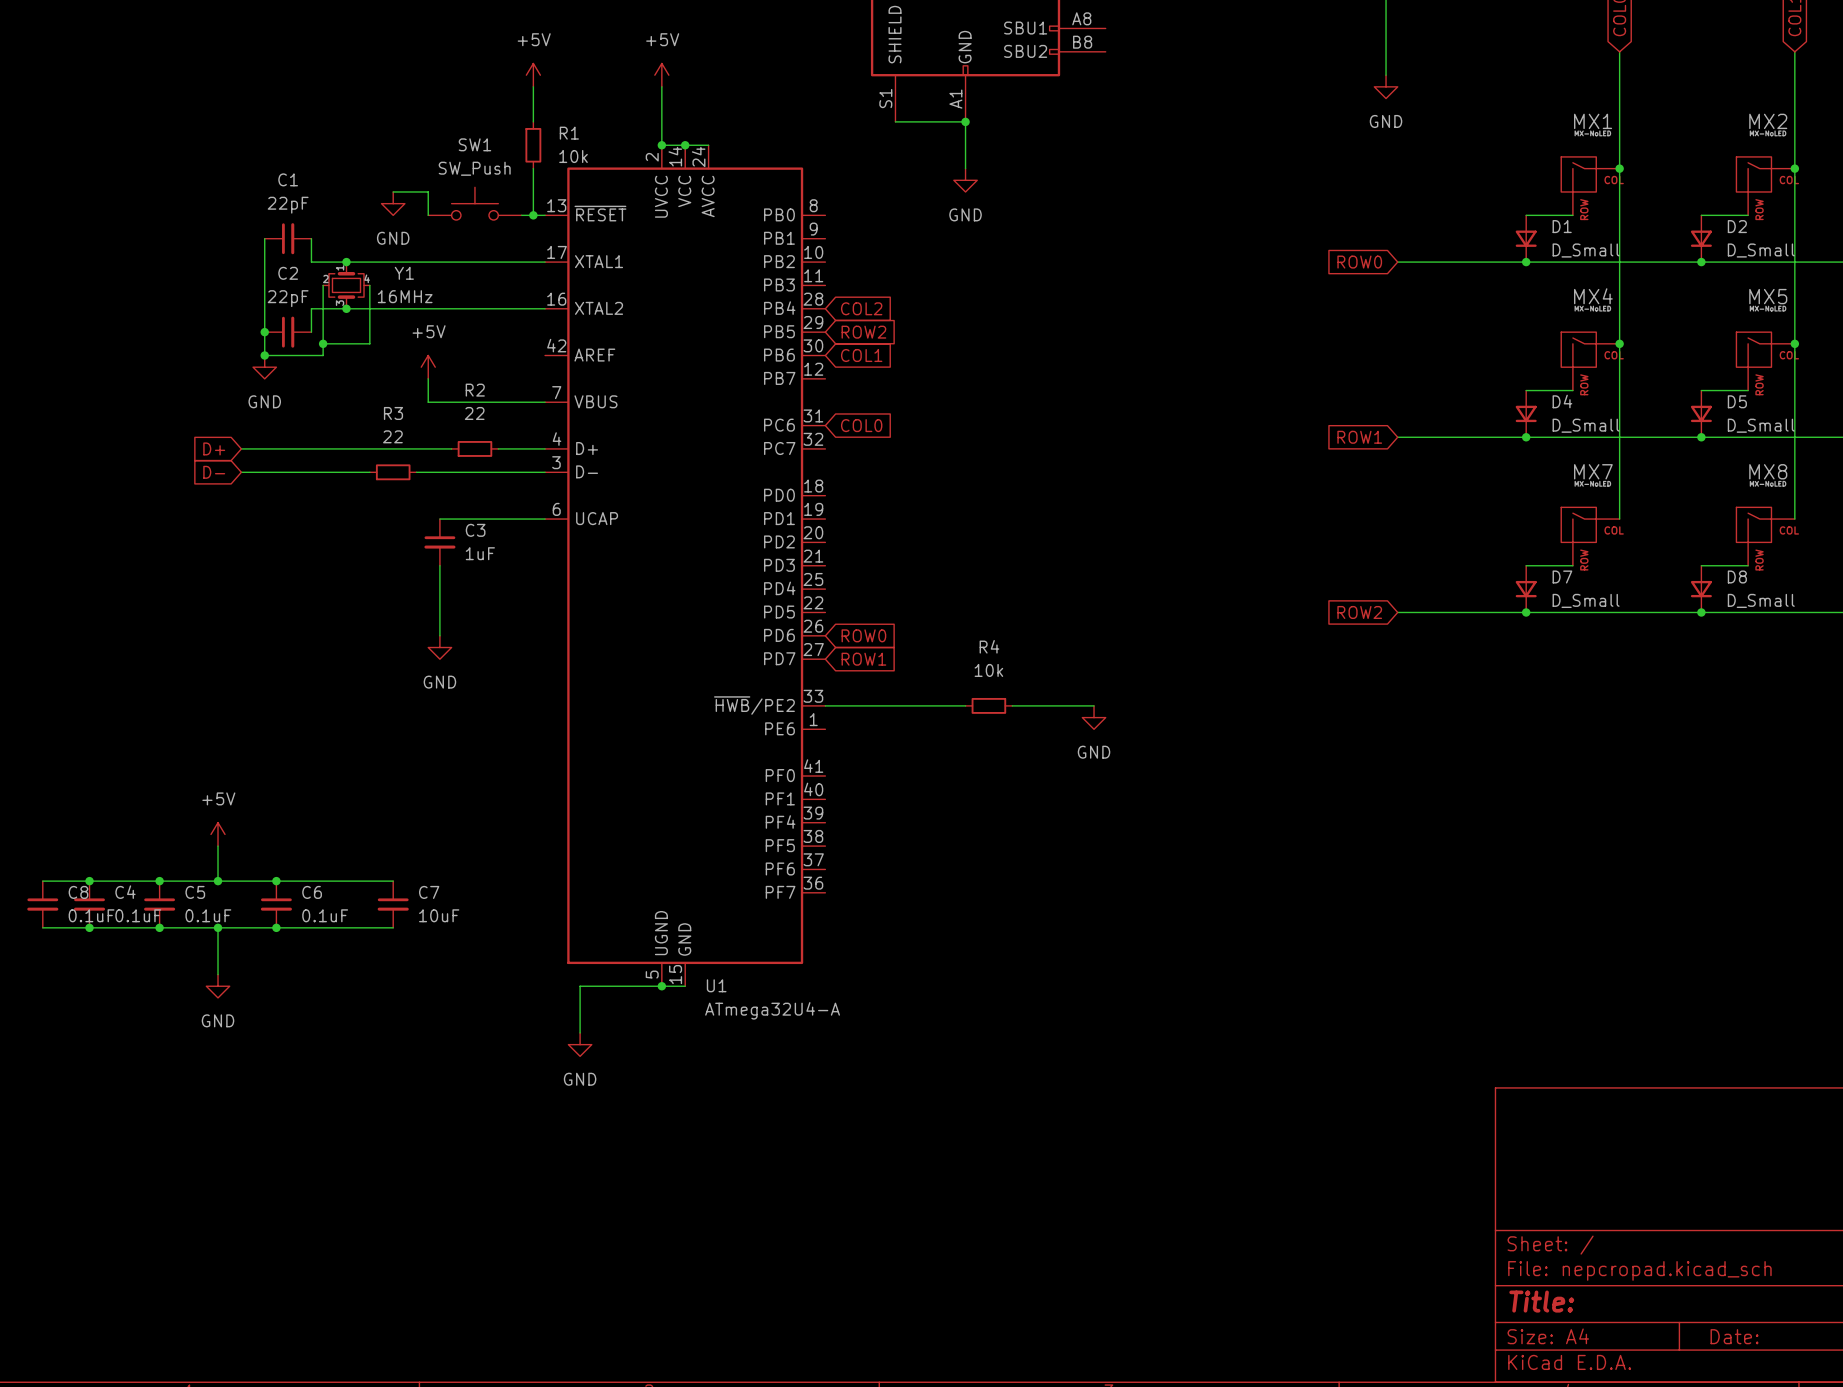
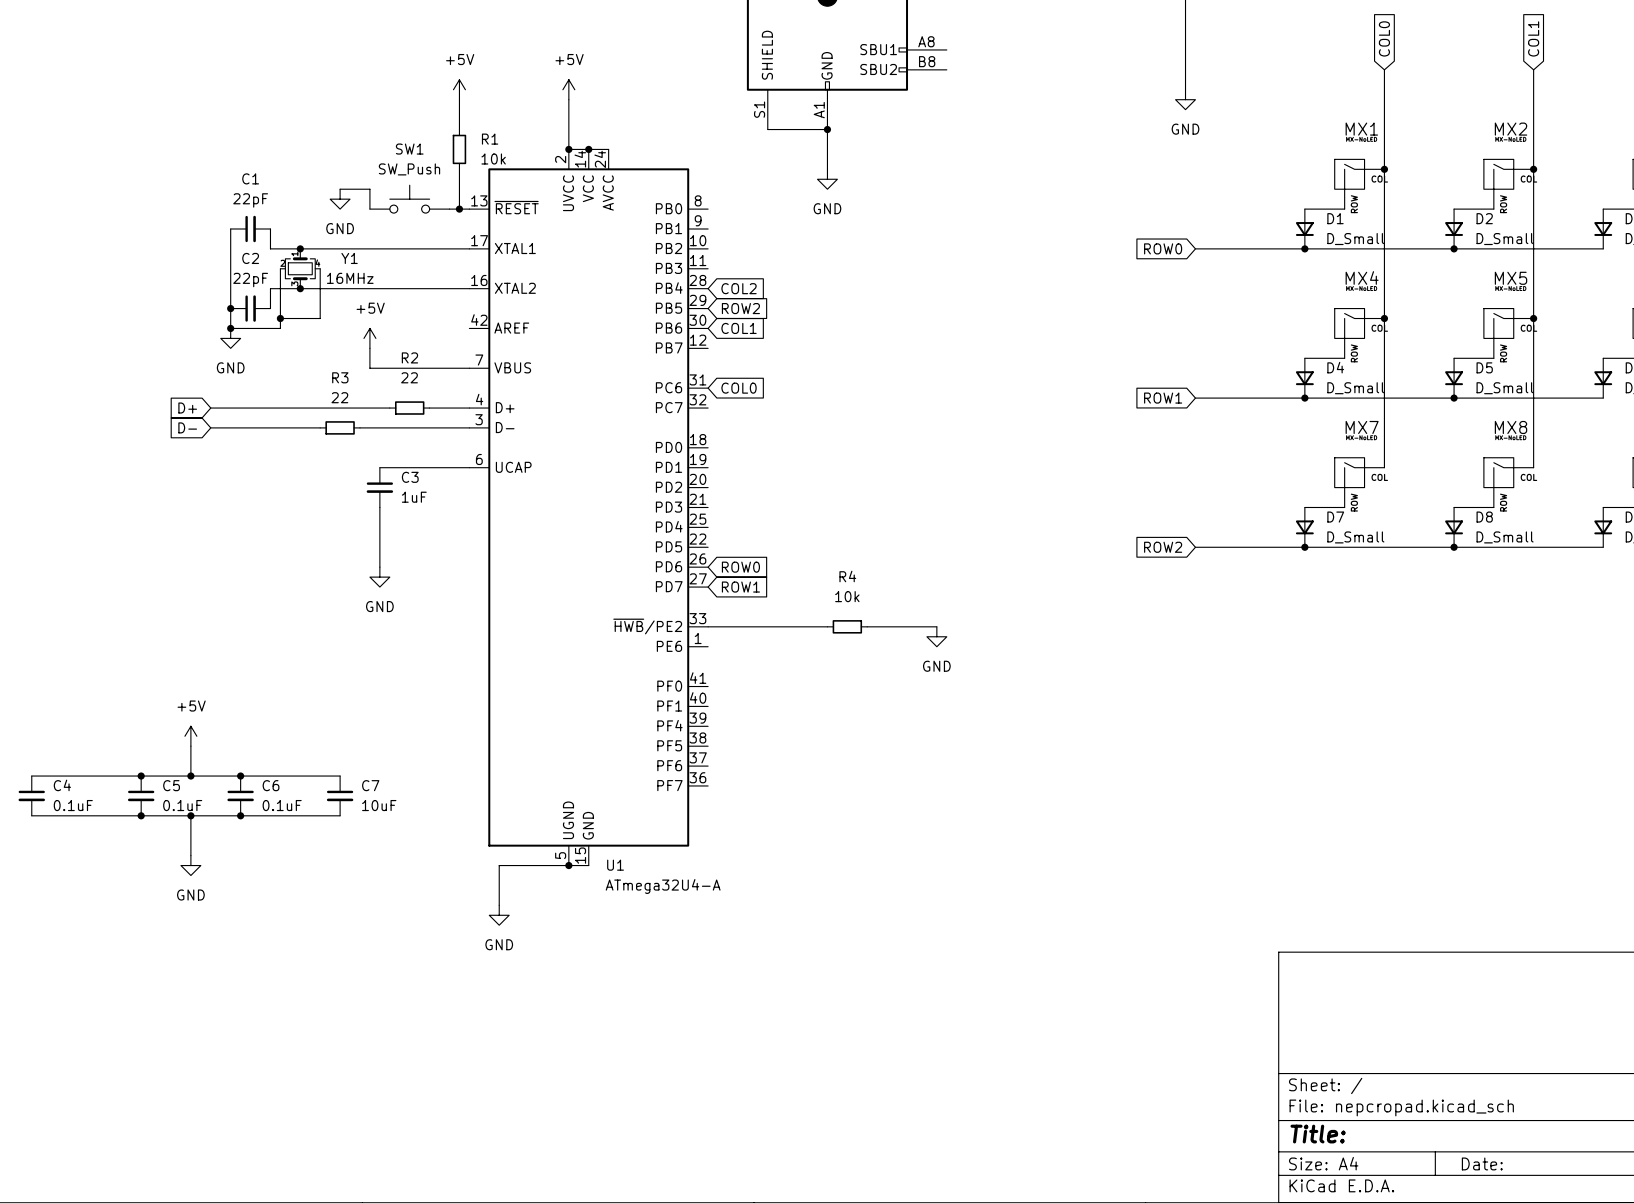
wire: none -> (31, 776) (41, 776)
junction: (89, 881) -> none
C8: 0.1uF (42, 904) -> none
C4 position: (89, 904) -> (31, 795)
wire: none -> (31, 815) (41, 815)
junction: (89, 927) -> none

